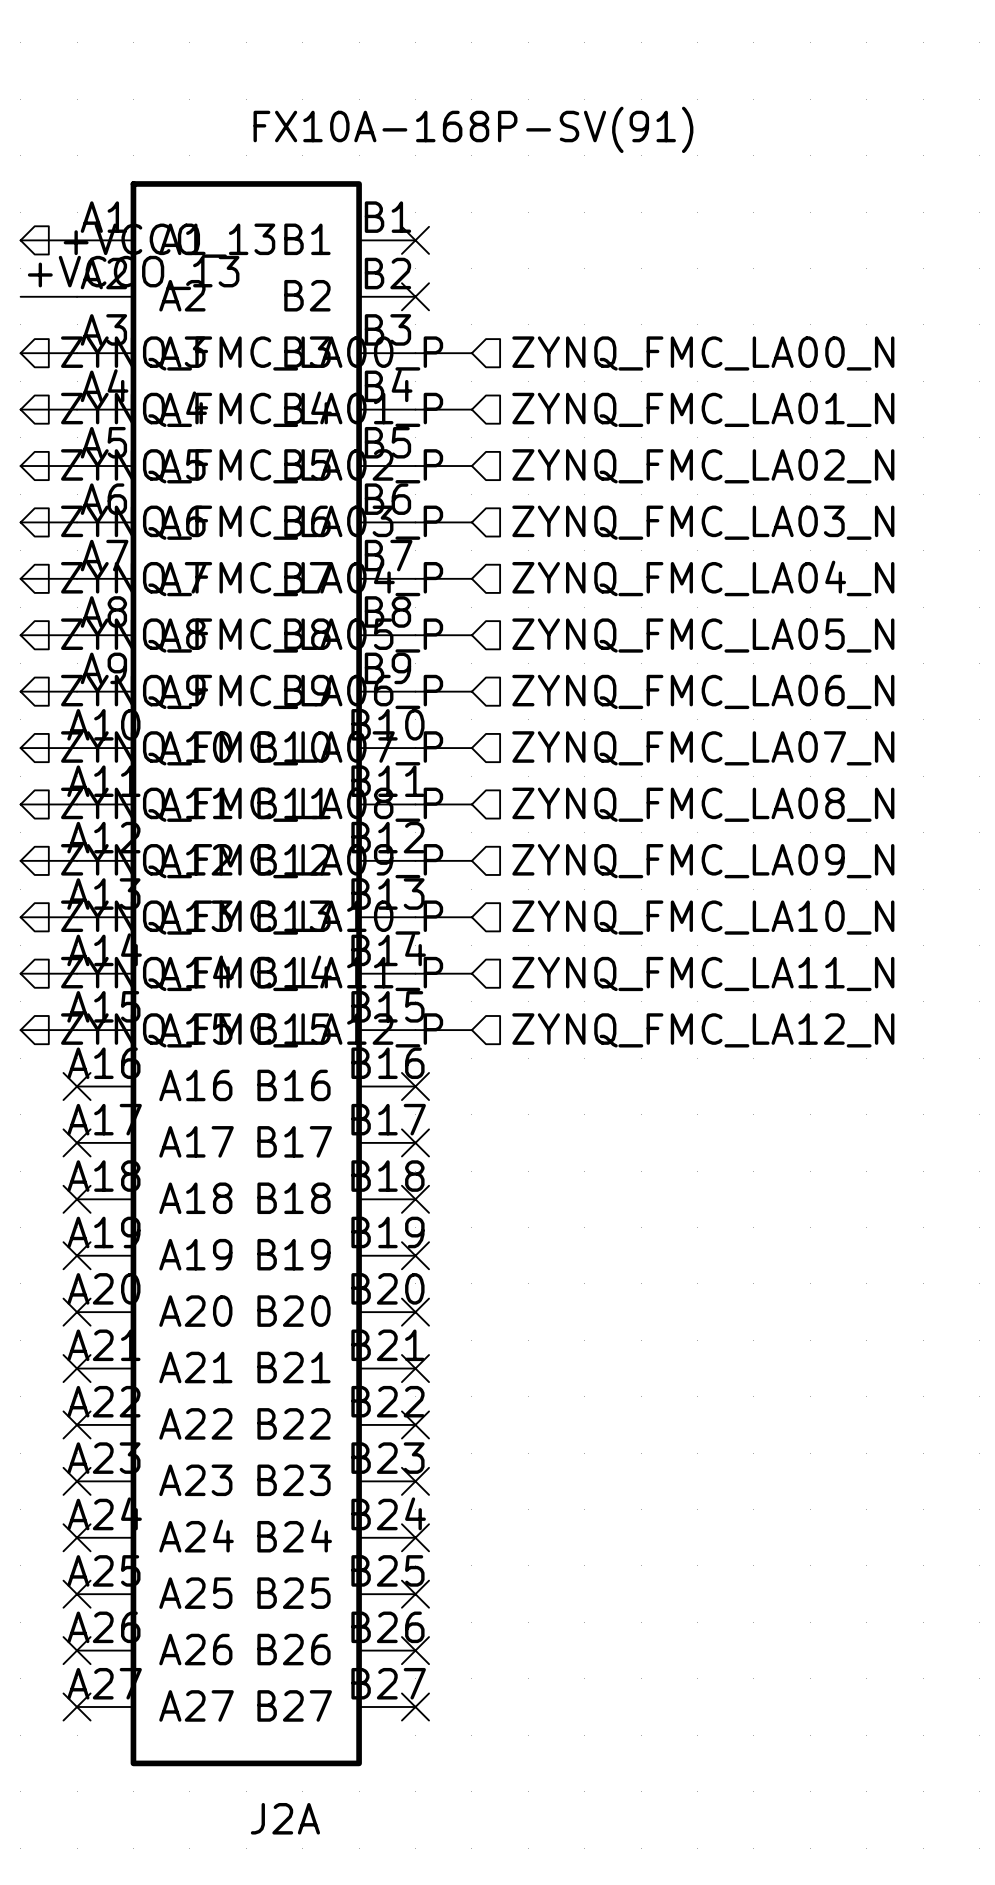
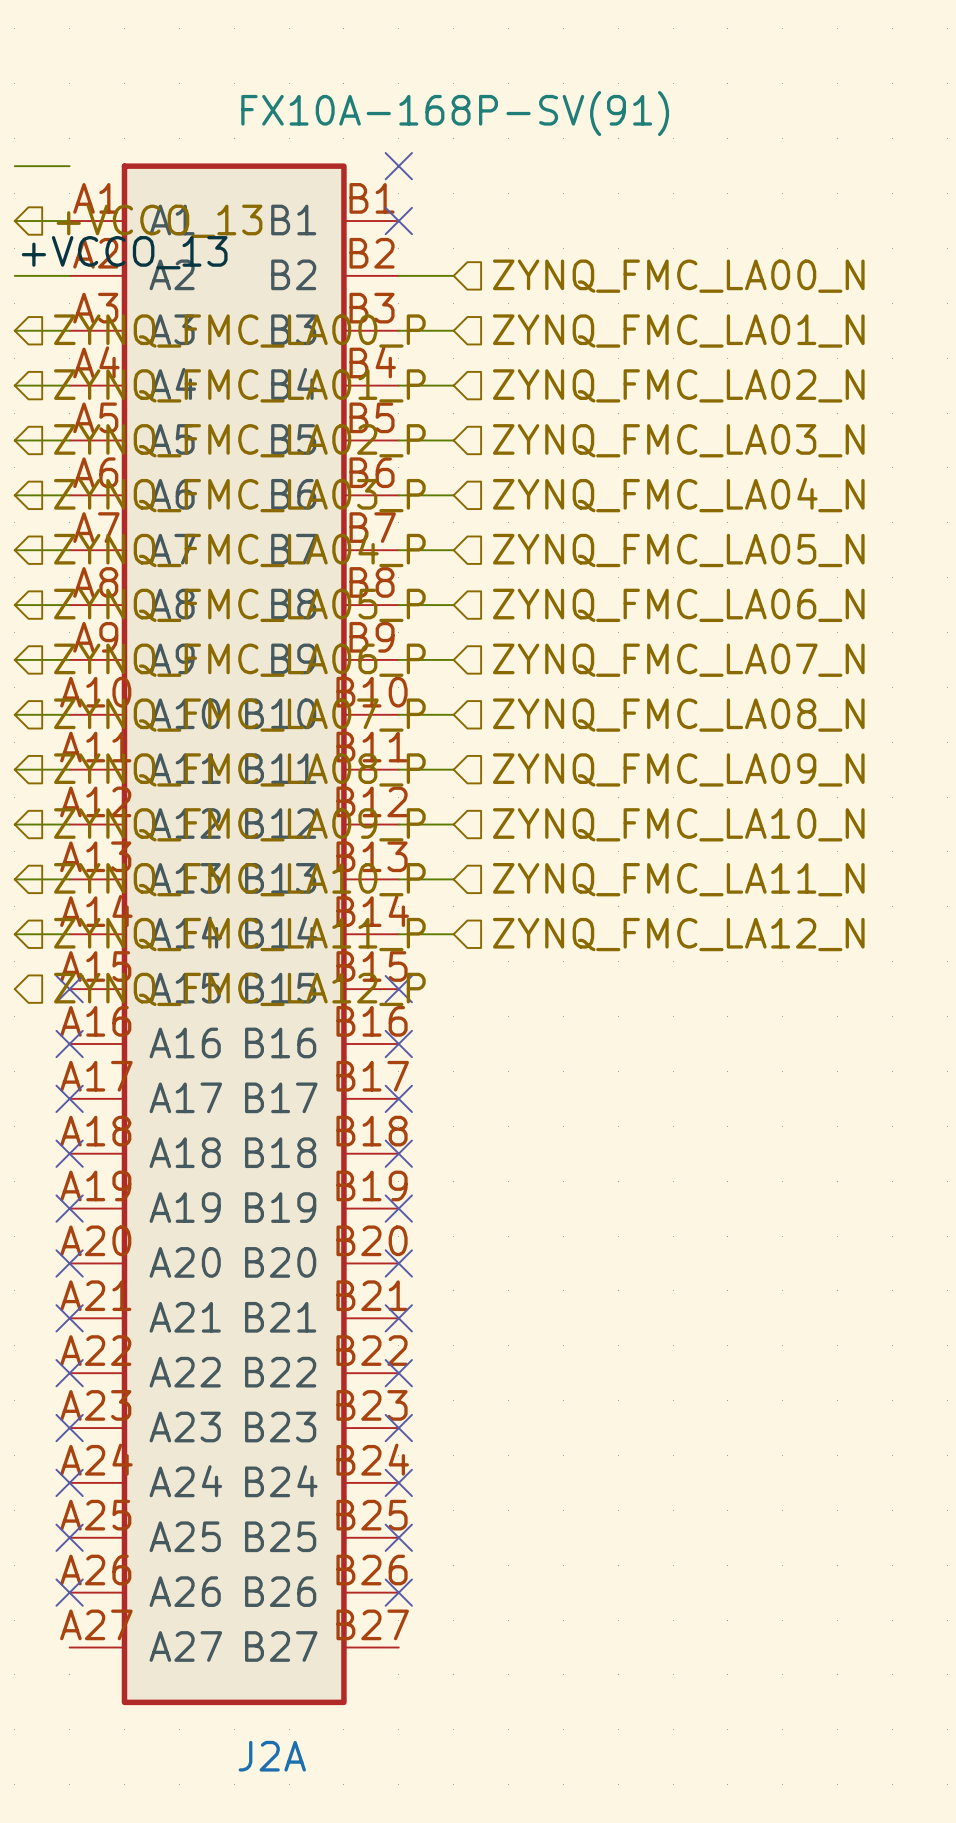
wire: none -> (14, 166) (69, 166)
wire: none -> (398, 275) (453, 275)
no-connect mark position: (415, 296) -> (398, 166)
hierarchical label: none -> ZYNQ_FMC_LA00_N (678, 276)
hierarchical label: ZYNQ_FMC_LA00_N (703, 353) -> ZYNQ_FMC_LA01_N (678, 331)
hierarchical label: ZYNQ_FMC_LA01_N (703, 409) -> ZYNQ_FMC_LA02_N (678, 385)
hierarchical label: ZYNQ_FMC_LA02_N (703, 466) -> ZYNQ_FMC_LA03_N (678, 440)
hierarchical label: ZYNQ_FMC_LA03_N (703, 522) -> ZYNQ_FMC_LA04_N (678, 494)
hierarchical label: ZYNQ_FMC_LA04_N (703, 578) -> ZYNQ_FMC_LA05_N (678, 550)
hierarchical label: ZYNQ_FMC_LA05_N (703, 635) -> ZYNQ_FMC_LA06_N (678, 605)
hierarchical label: ZYNQ_FMC_LA06_N (703, 691) -> ZYNQ_FMC_LA07_N (678, 660)
hierarchical label: ZYNQ_FMC_LA07_N (703, 748) -> ZYNQ_FMC_LA08_N (678, 715)
hierarchical label: ZYNQ_FMC_LA08_N (703, 804) -> ZYNQ_FMC_LA09_N (678, 769)
hierarchical label: ZYNQ_FMC_LA09_N (703, 861) -> ZYNQ_FMC_LA10_N (678, 824)
hierarchical label: ZYNQ_FMC_LA10_N (703, 917) -> ZYNQ_FMC_LA11_N (678, 879)
hierarchical label: ZYNQ_FMC_LA11_N (703, 973) -> ZYNQ_FMC_LA12_N (678, 934)
wire: (20, 1030) (77, 1030) -> none
no-connect mark: none -> (69, 989)
wire: (415, 1030) (471, 1030) -> none
no-connect mark: none -> (398, 989)
hierarchical label: ZYNQ_FMC_LA12_N (703, 1030) -> none
no-connect mark: (77, 1707) -> none
no-connect mark: (415, 1707) -> none

